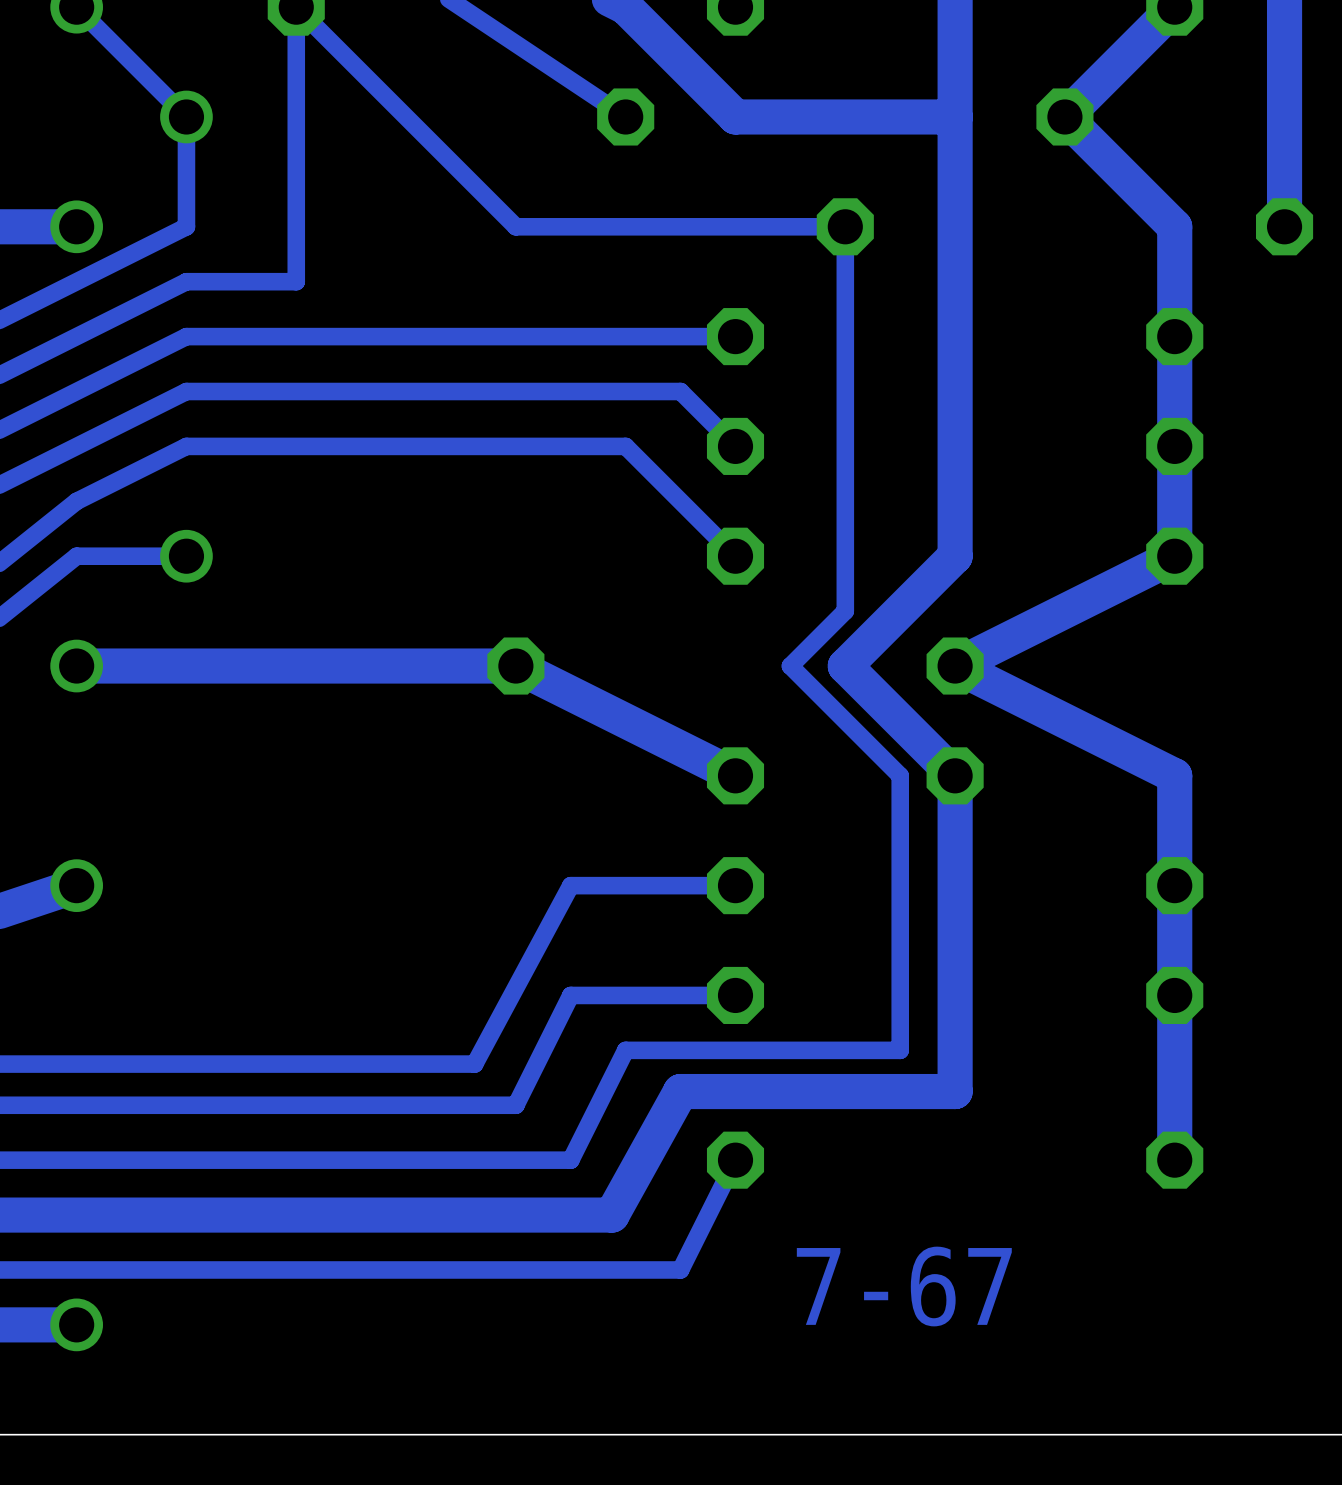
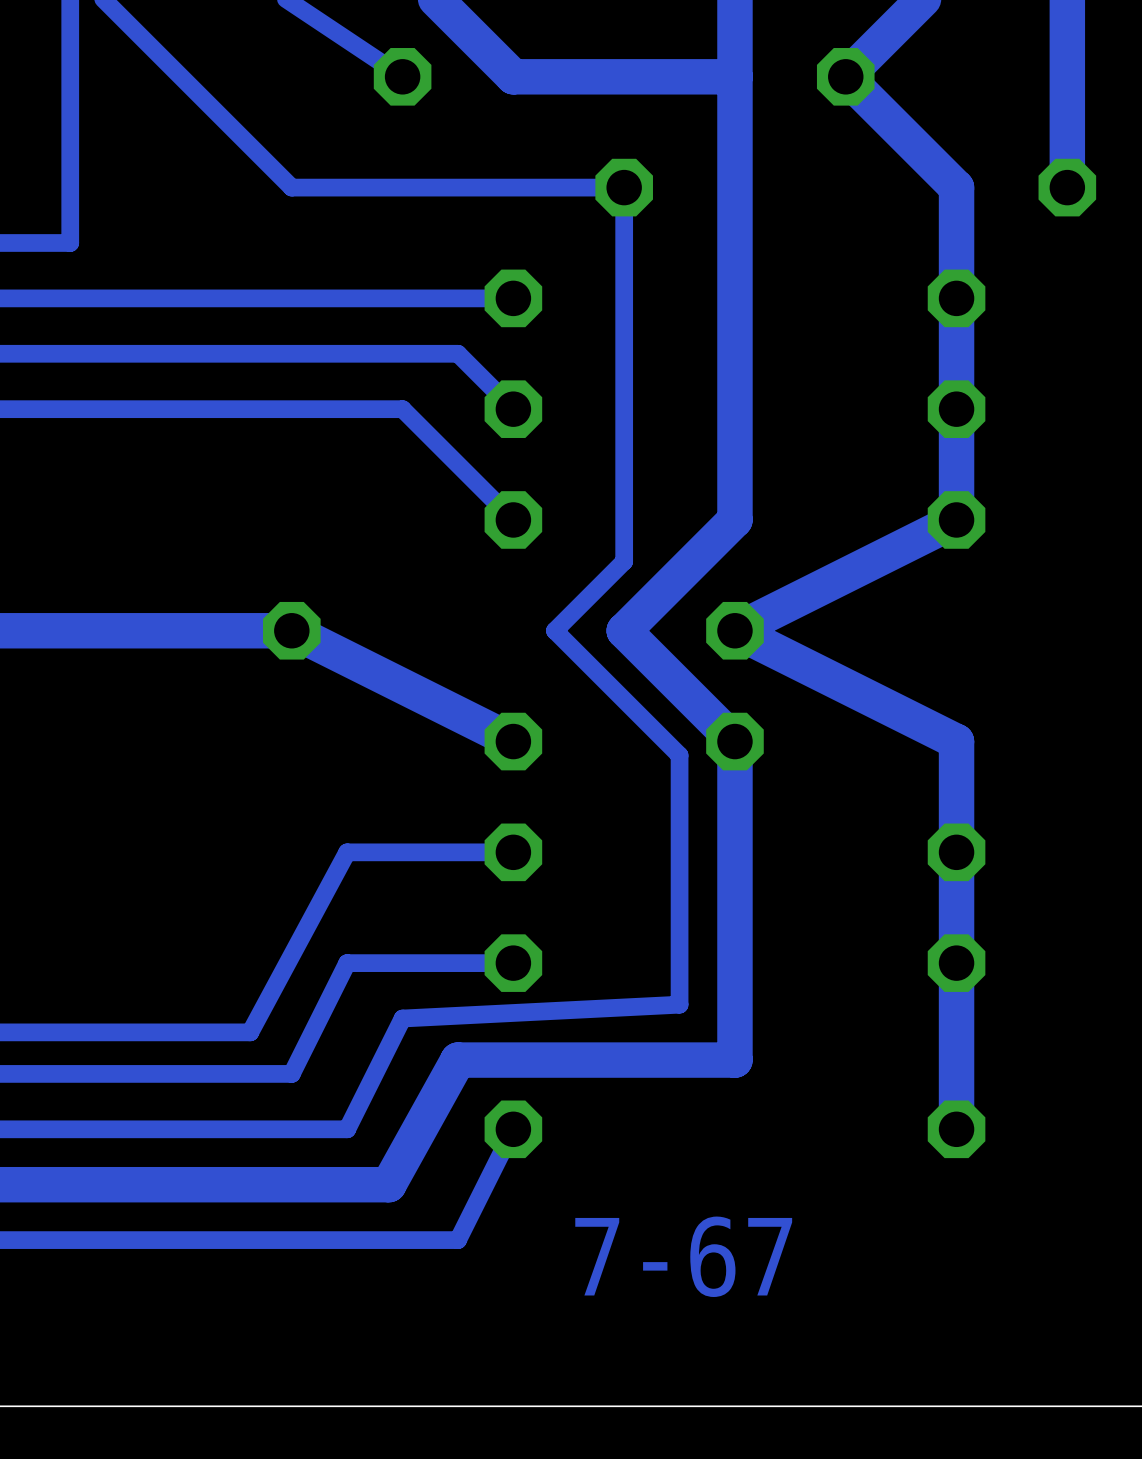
track: (845, 597) (845, 611) (790, 666) (900, 775) (900, 789) -> (624, 561) (554, 630) (679, 755)
track: (900, 1036) (900, 1050) (625, 1050) -> (679, 1004) (402, 1018)

